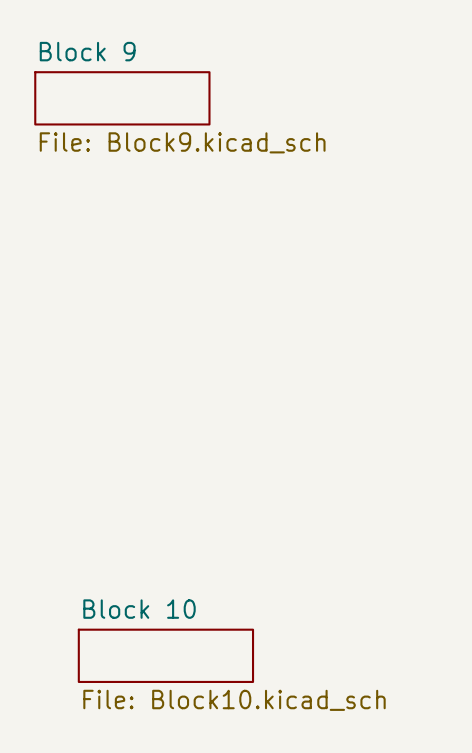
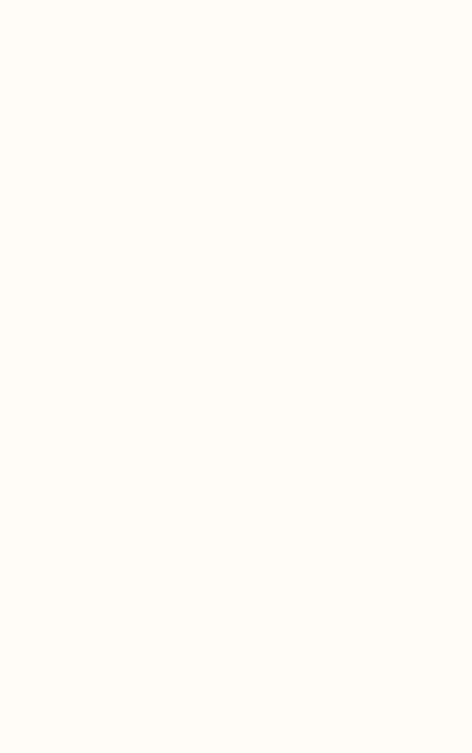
sheet Block 9: File: Block9.kicad_sch (122, 98) -> none
sheet Block 10: File: Block10.kicad_sch (165, 655) -> none

